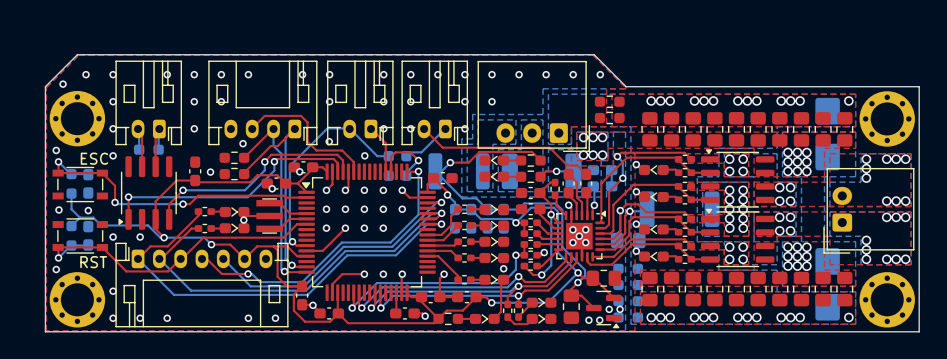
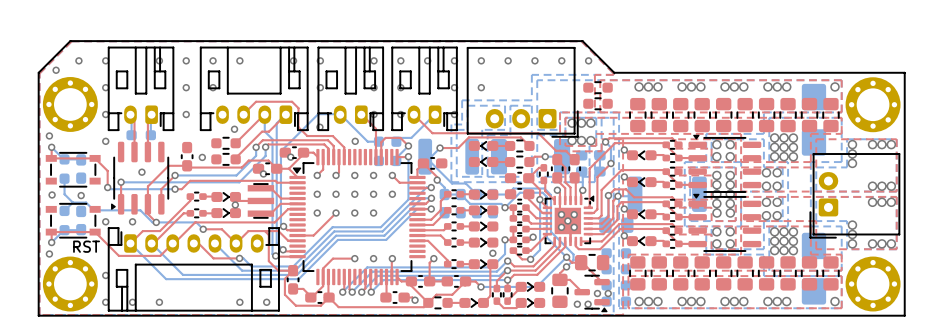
text: ESC (94, 158) -> none
via: none -> (141, 172)
top track: none -> (323, 276) (323, 286) (311, 297)
via: (312, 305) -> none

